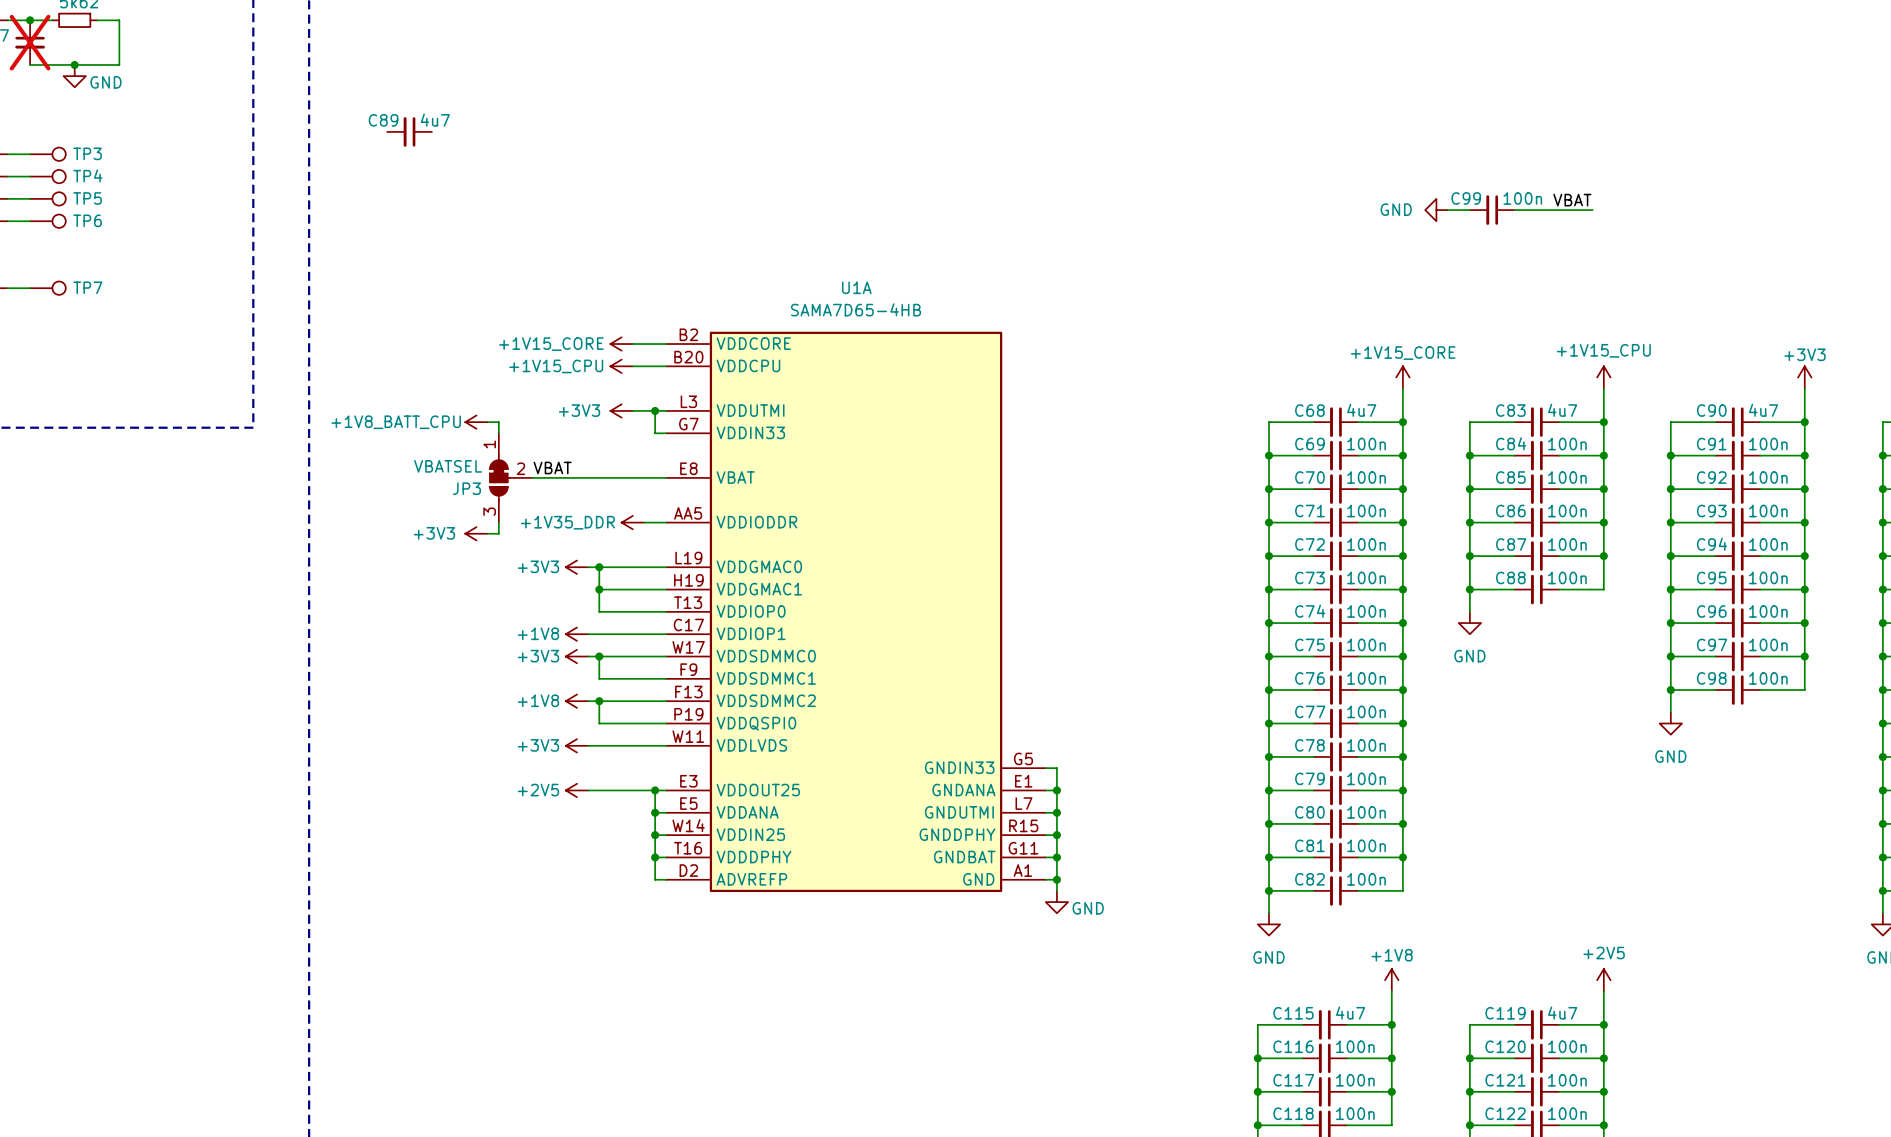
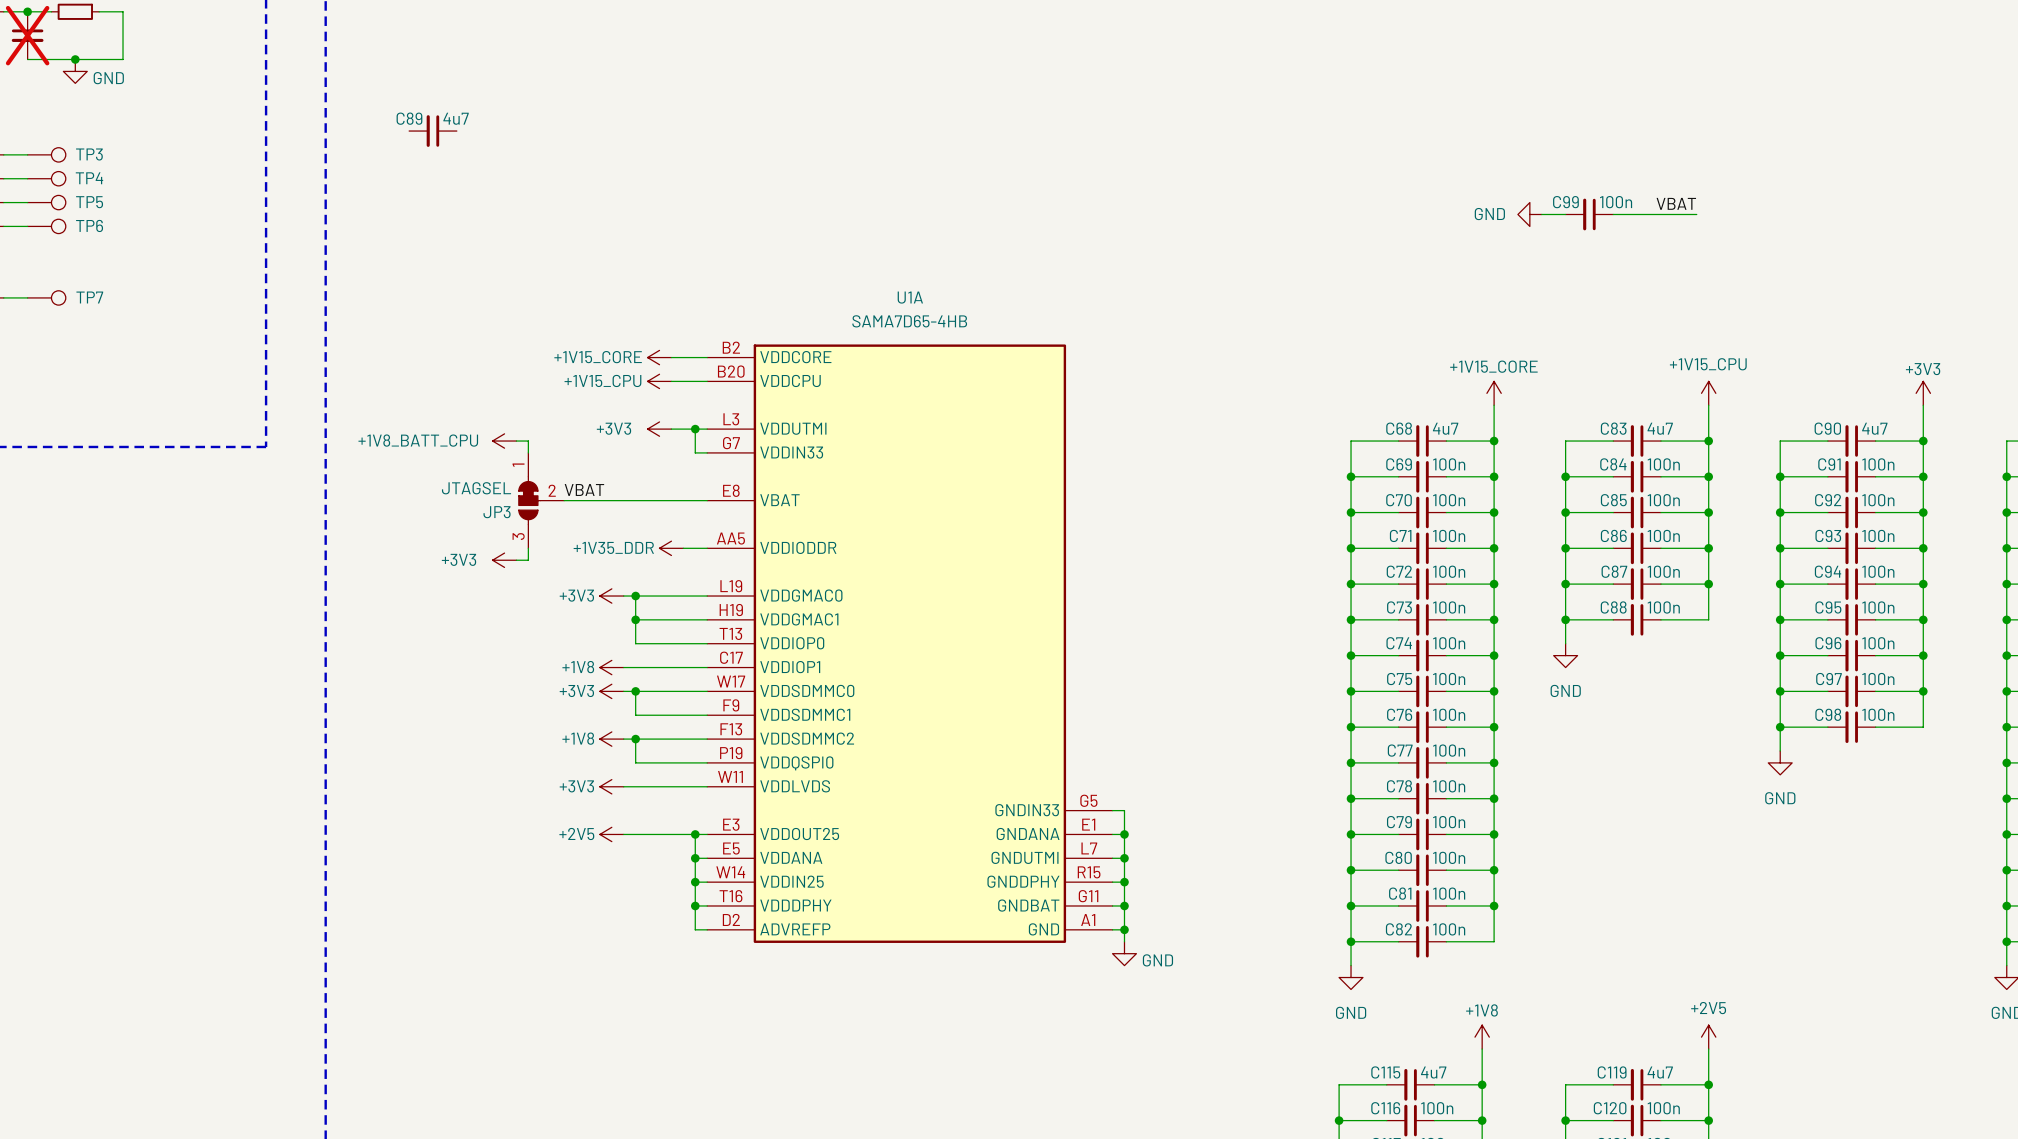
JP3 value: VBATSEL (448, 466) -> JTAGSEL (476, 488)

